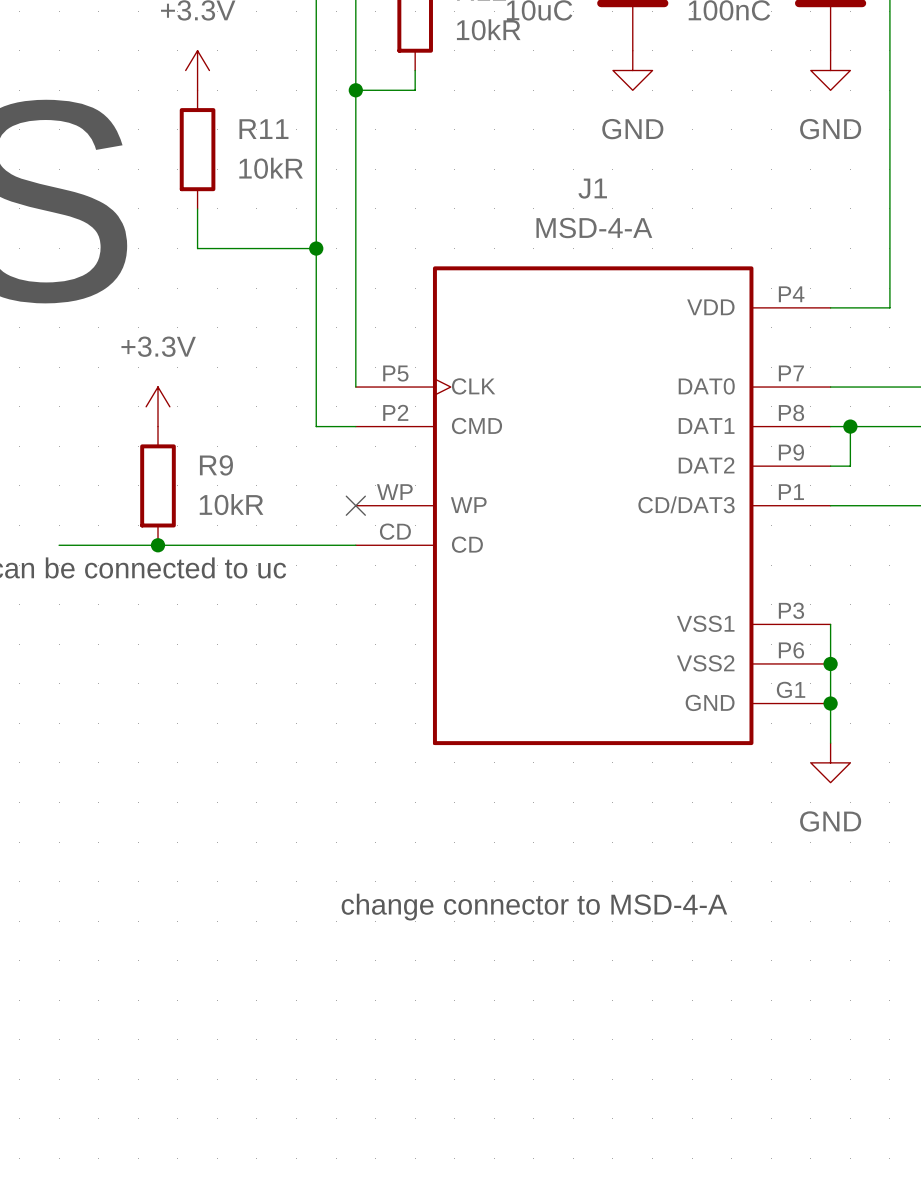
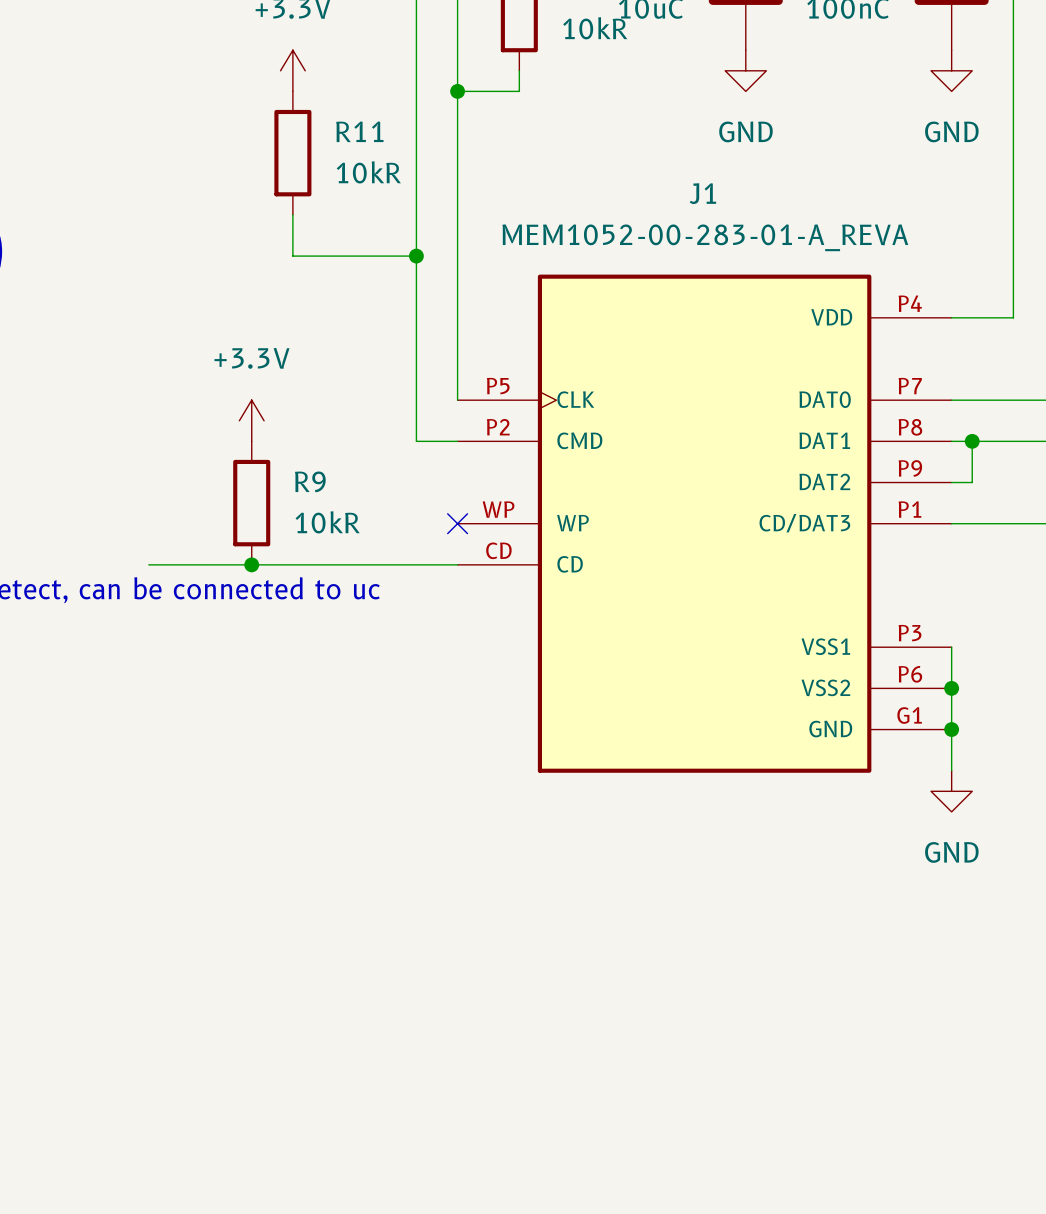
J1 value: MSD-4-A (594, 228) -> MEM1052-00-283-01-A_REVA (705, 237)
text: change connector to MSD-4-A (534, 907) -> none

